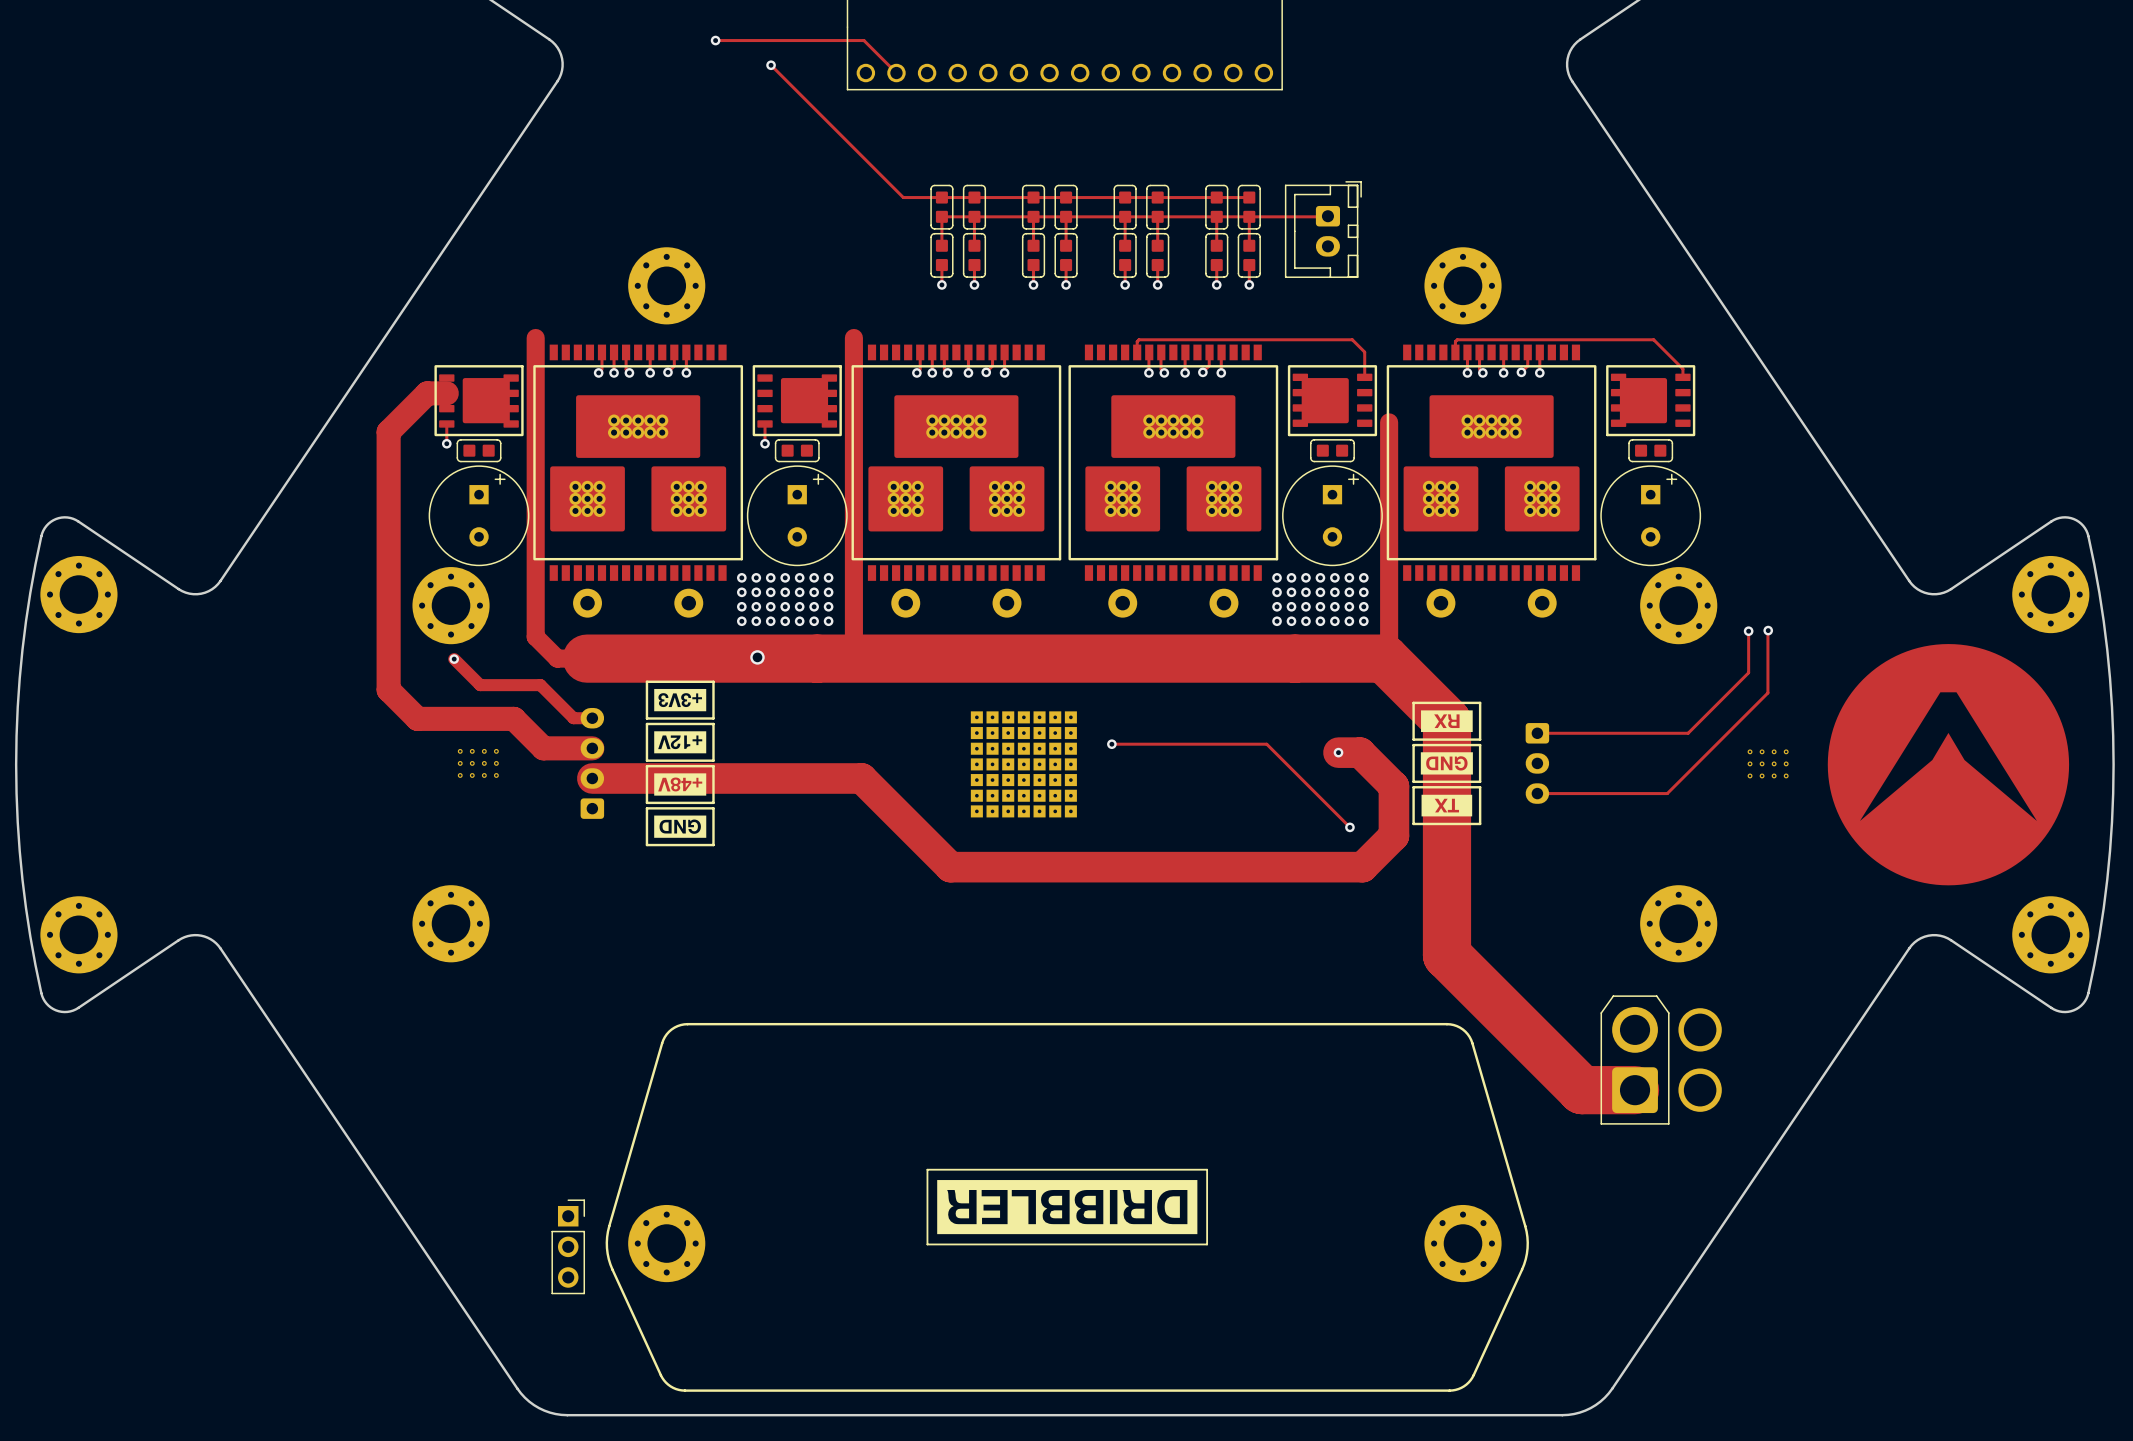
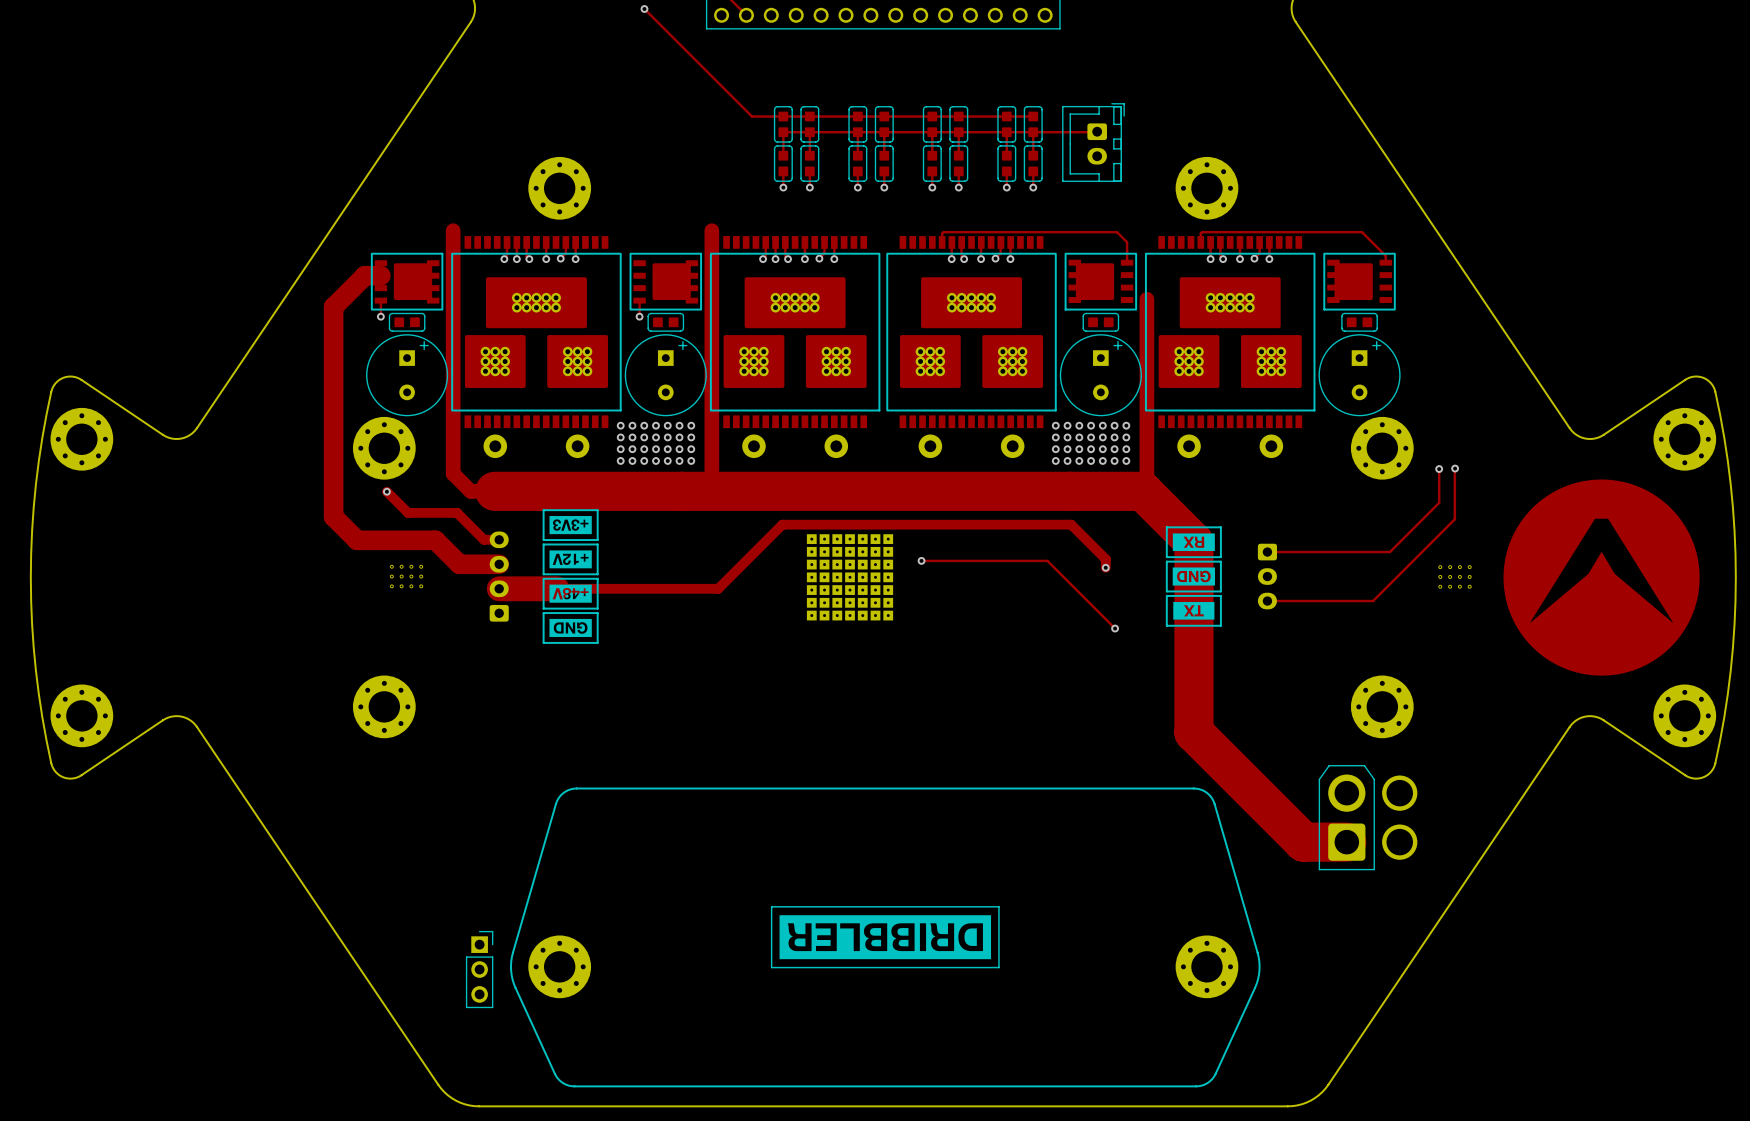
via: (757, 657) -> none
track: (1338, 752) (1360, 752) (1393, 786) (1393, 835) (1362, 867) (950, 867) (861, 778) -> (1105, 567) (1105, 559) (1071, 524) (782, 524) (718, 588)
track width: thick (663, 778) (861, 778) -> thin (556, 588) (718, 588)

